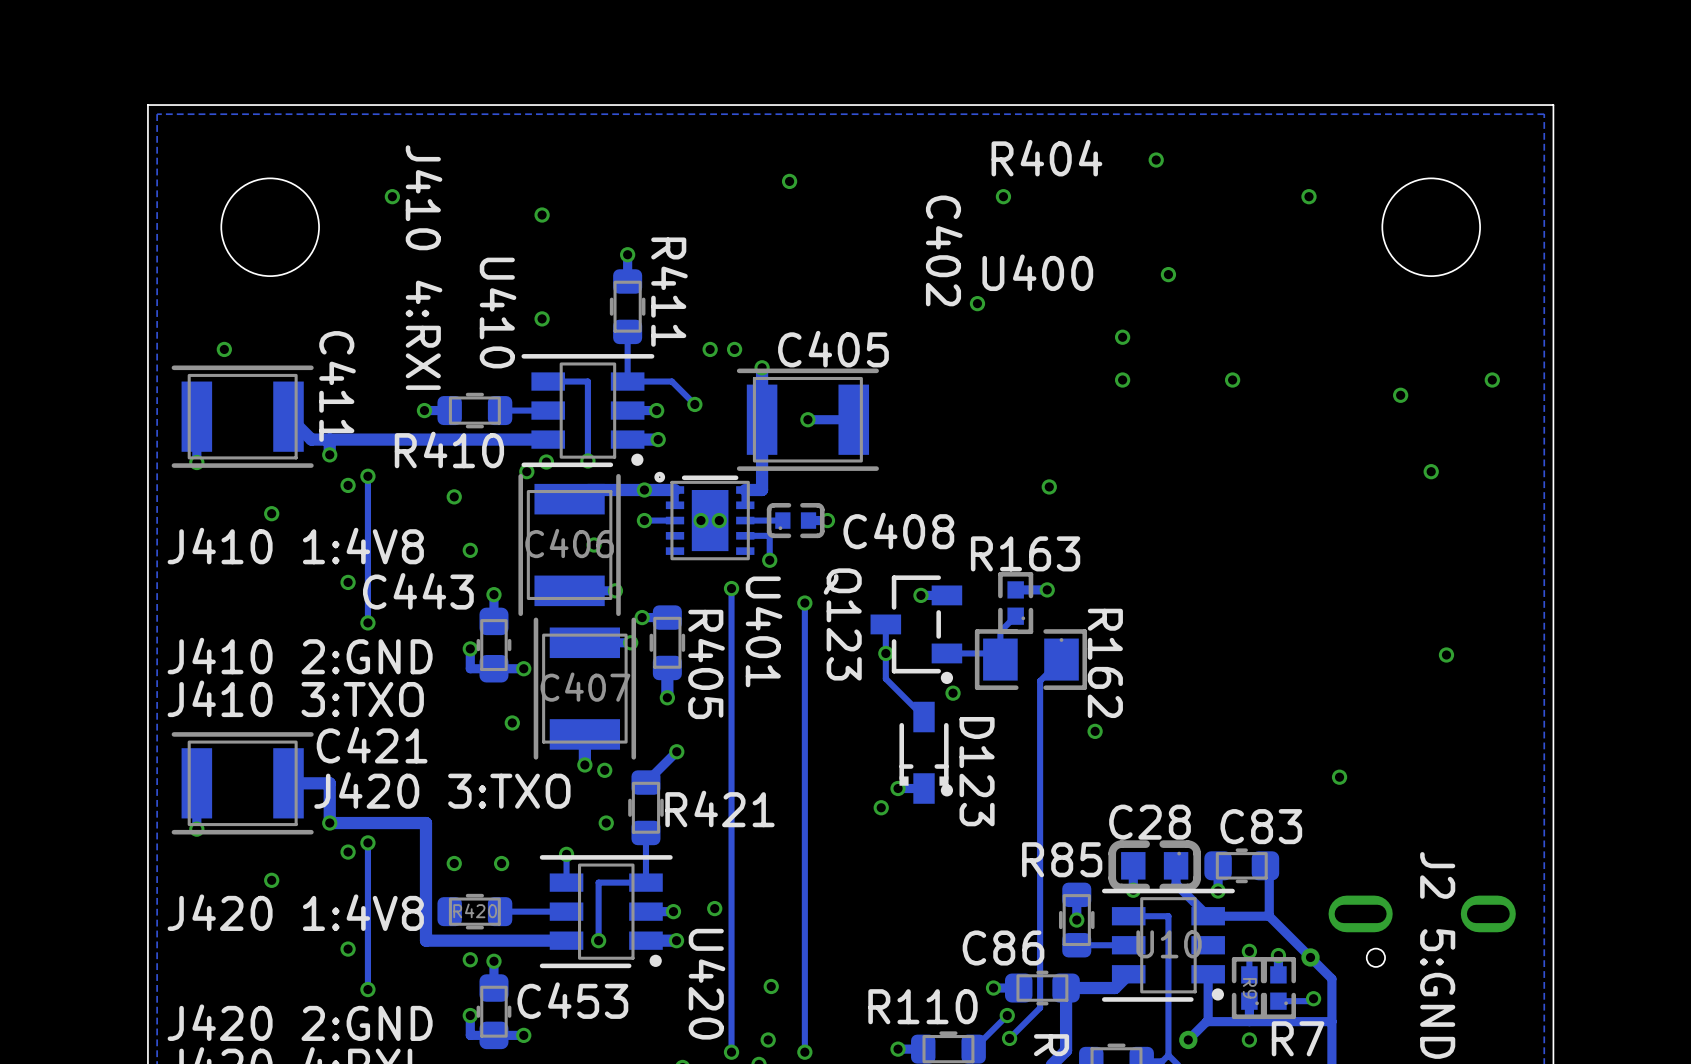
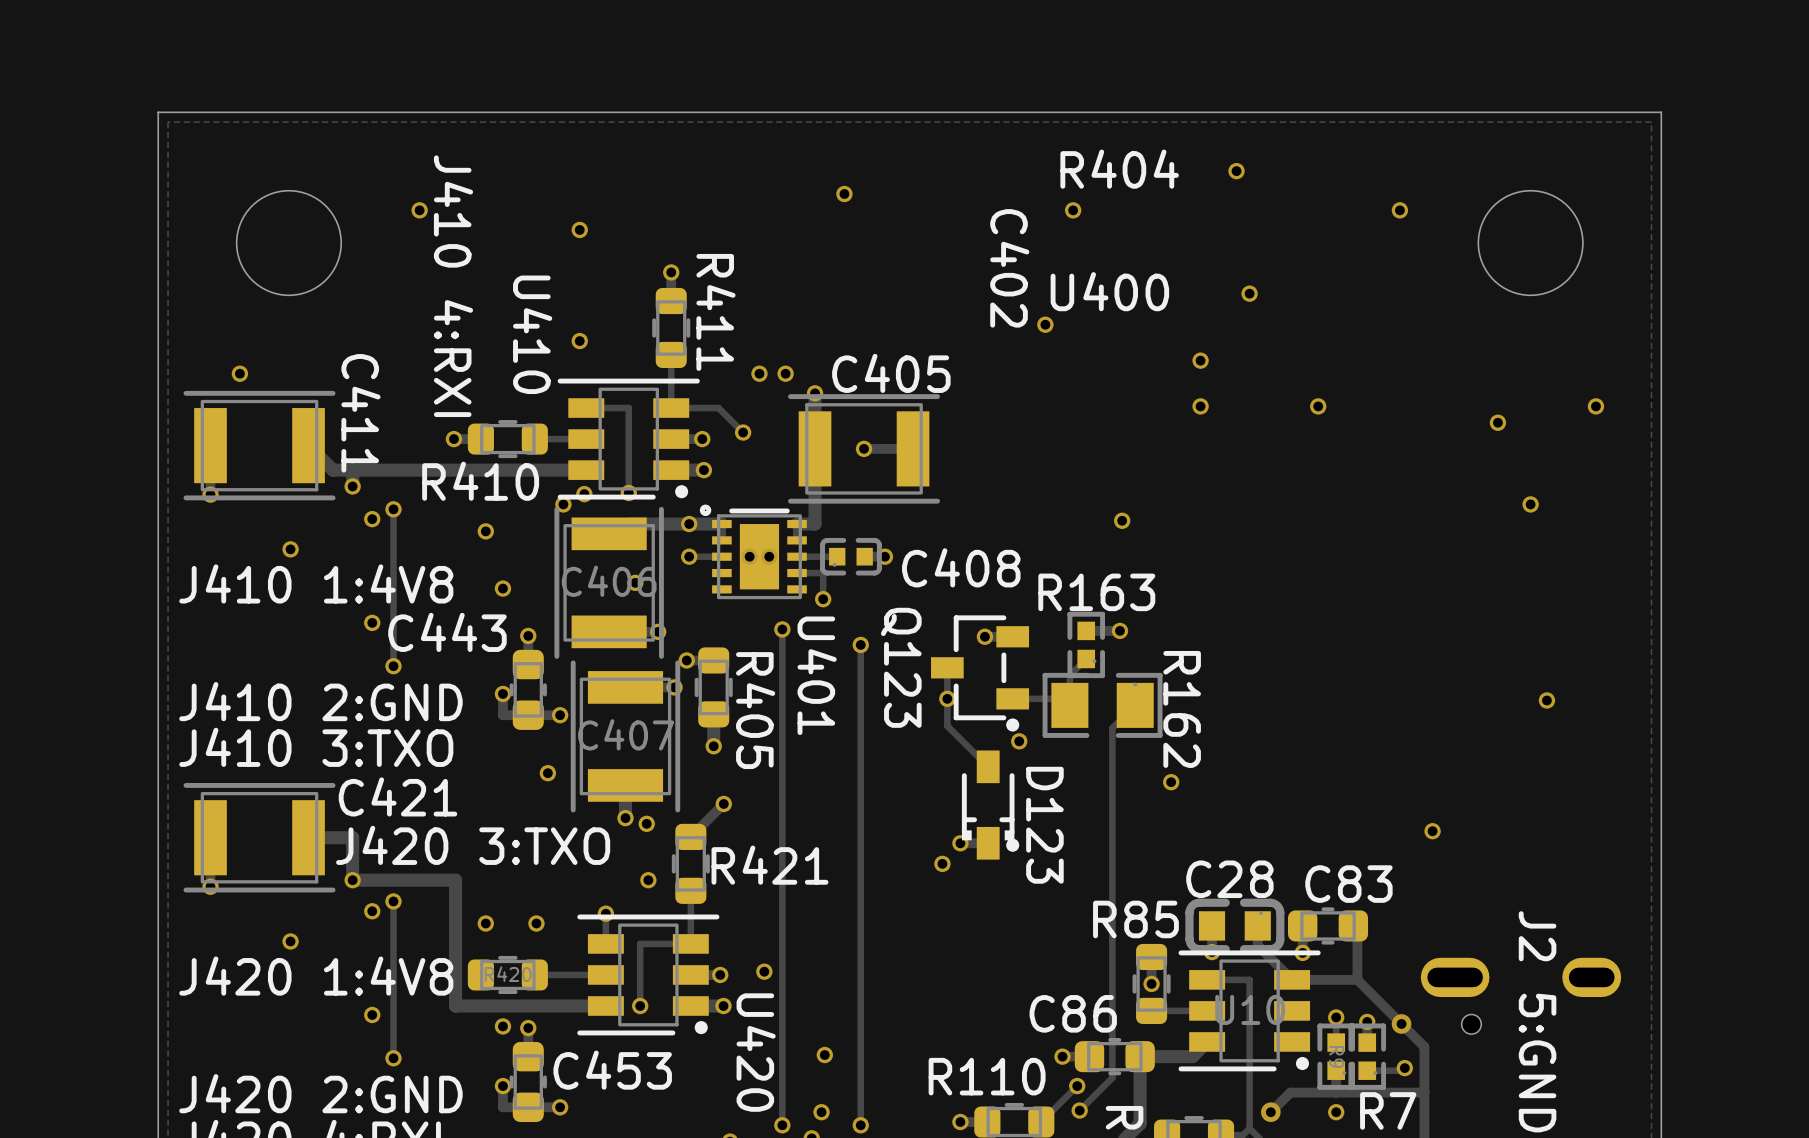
track: (1208, 974) (1208, 1021) -> none

